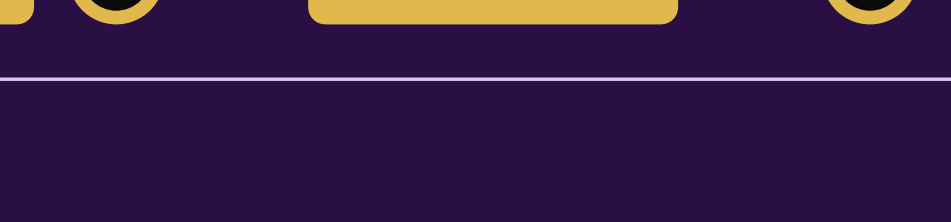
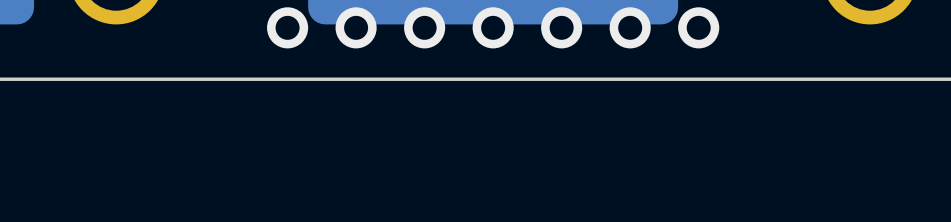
via: none -> (287, 27)
via: none -> (356, 27)
via: none -> (424, 27)
via: none -> (493, 27)
via: none -> (561, 27)
via: none -> (630, 27)
via: none -> (698, 27)

